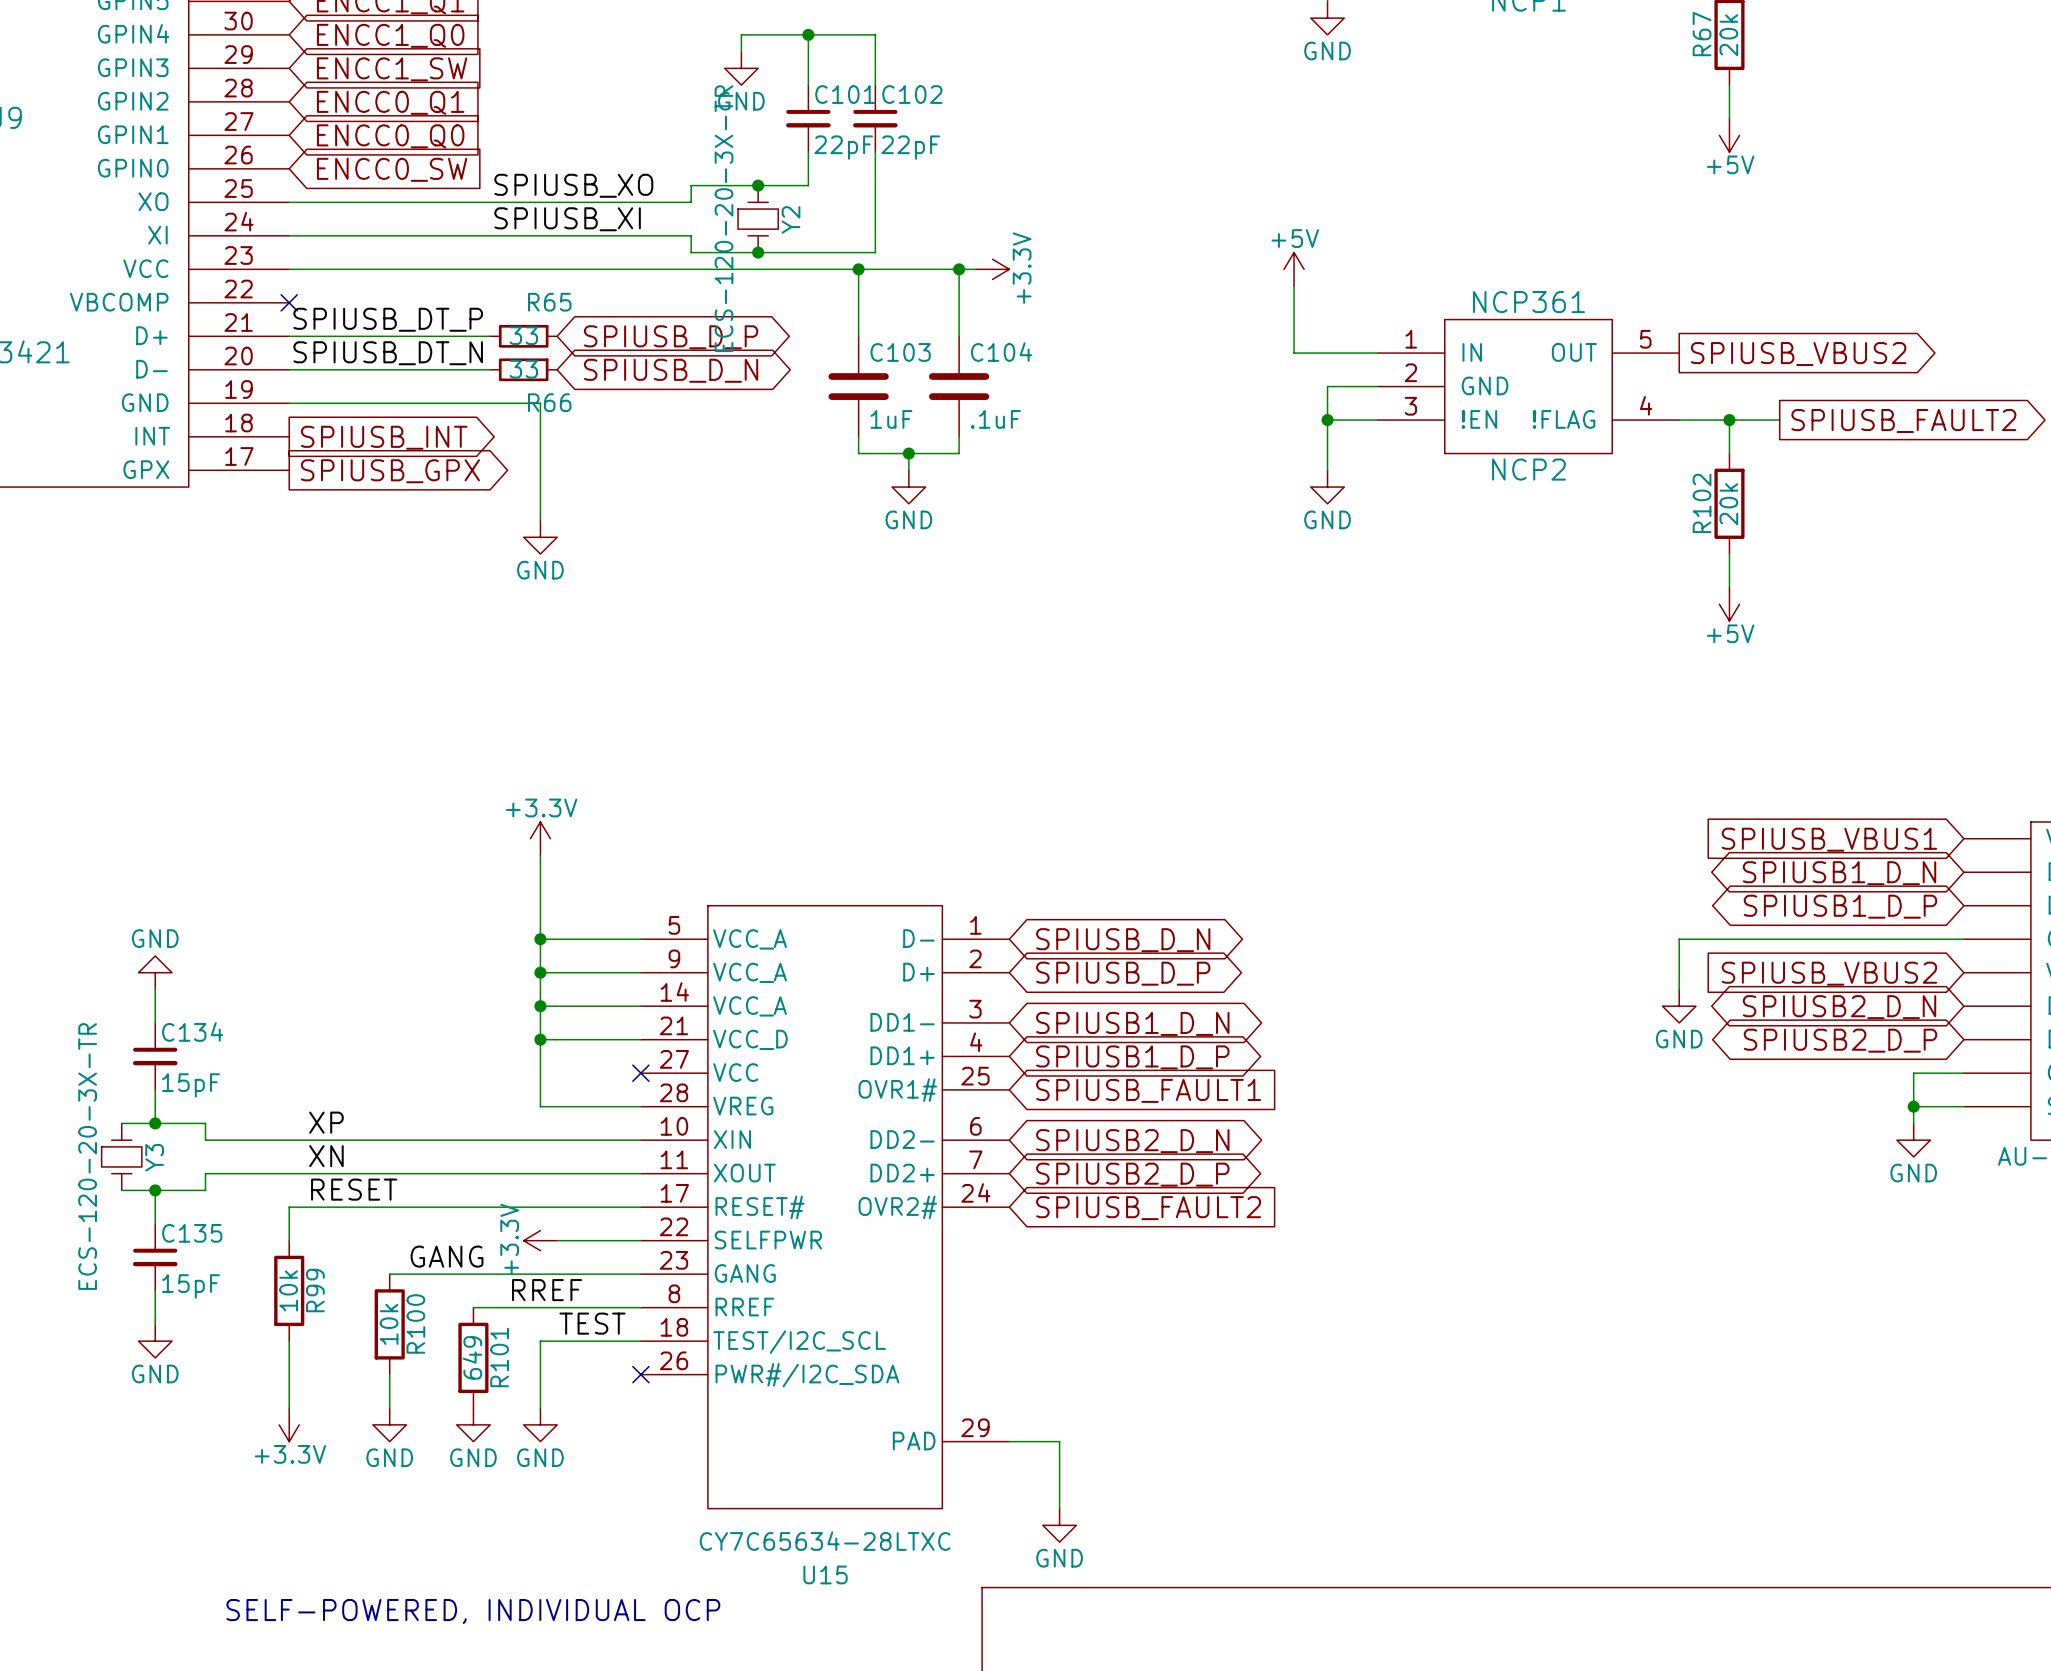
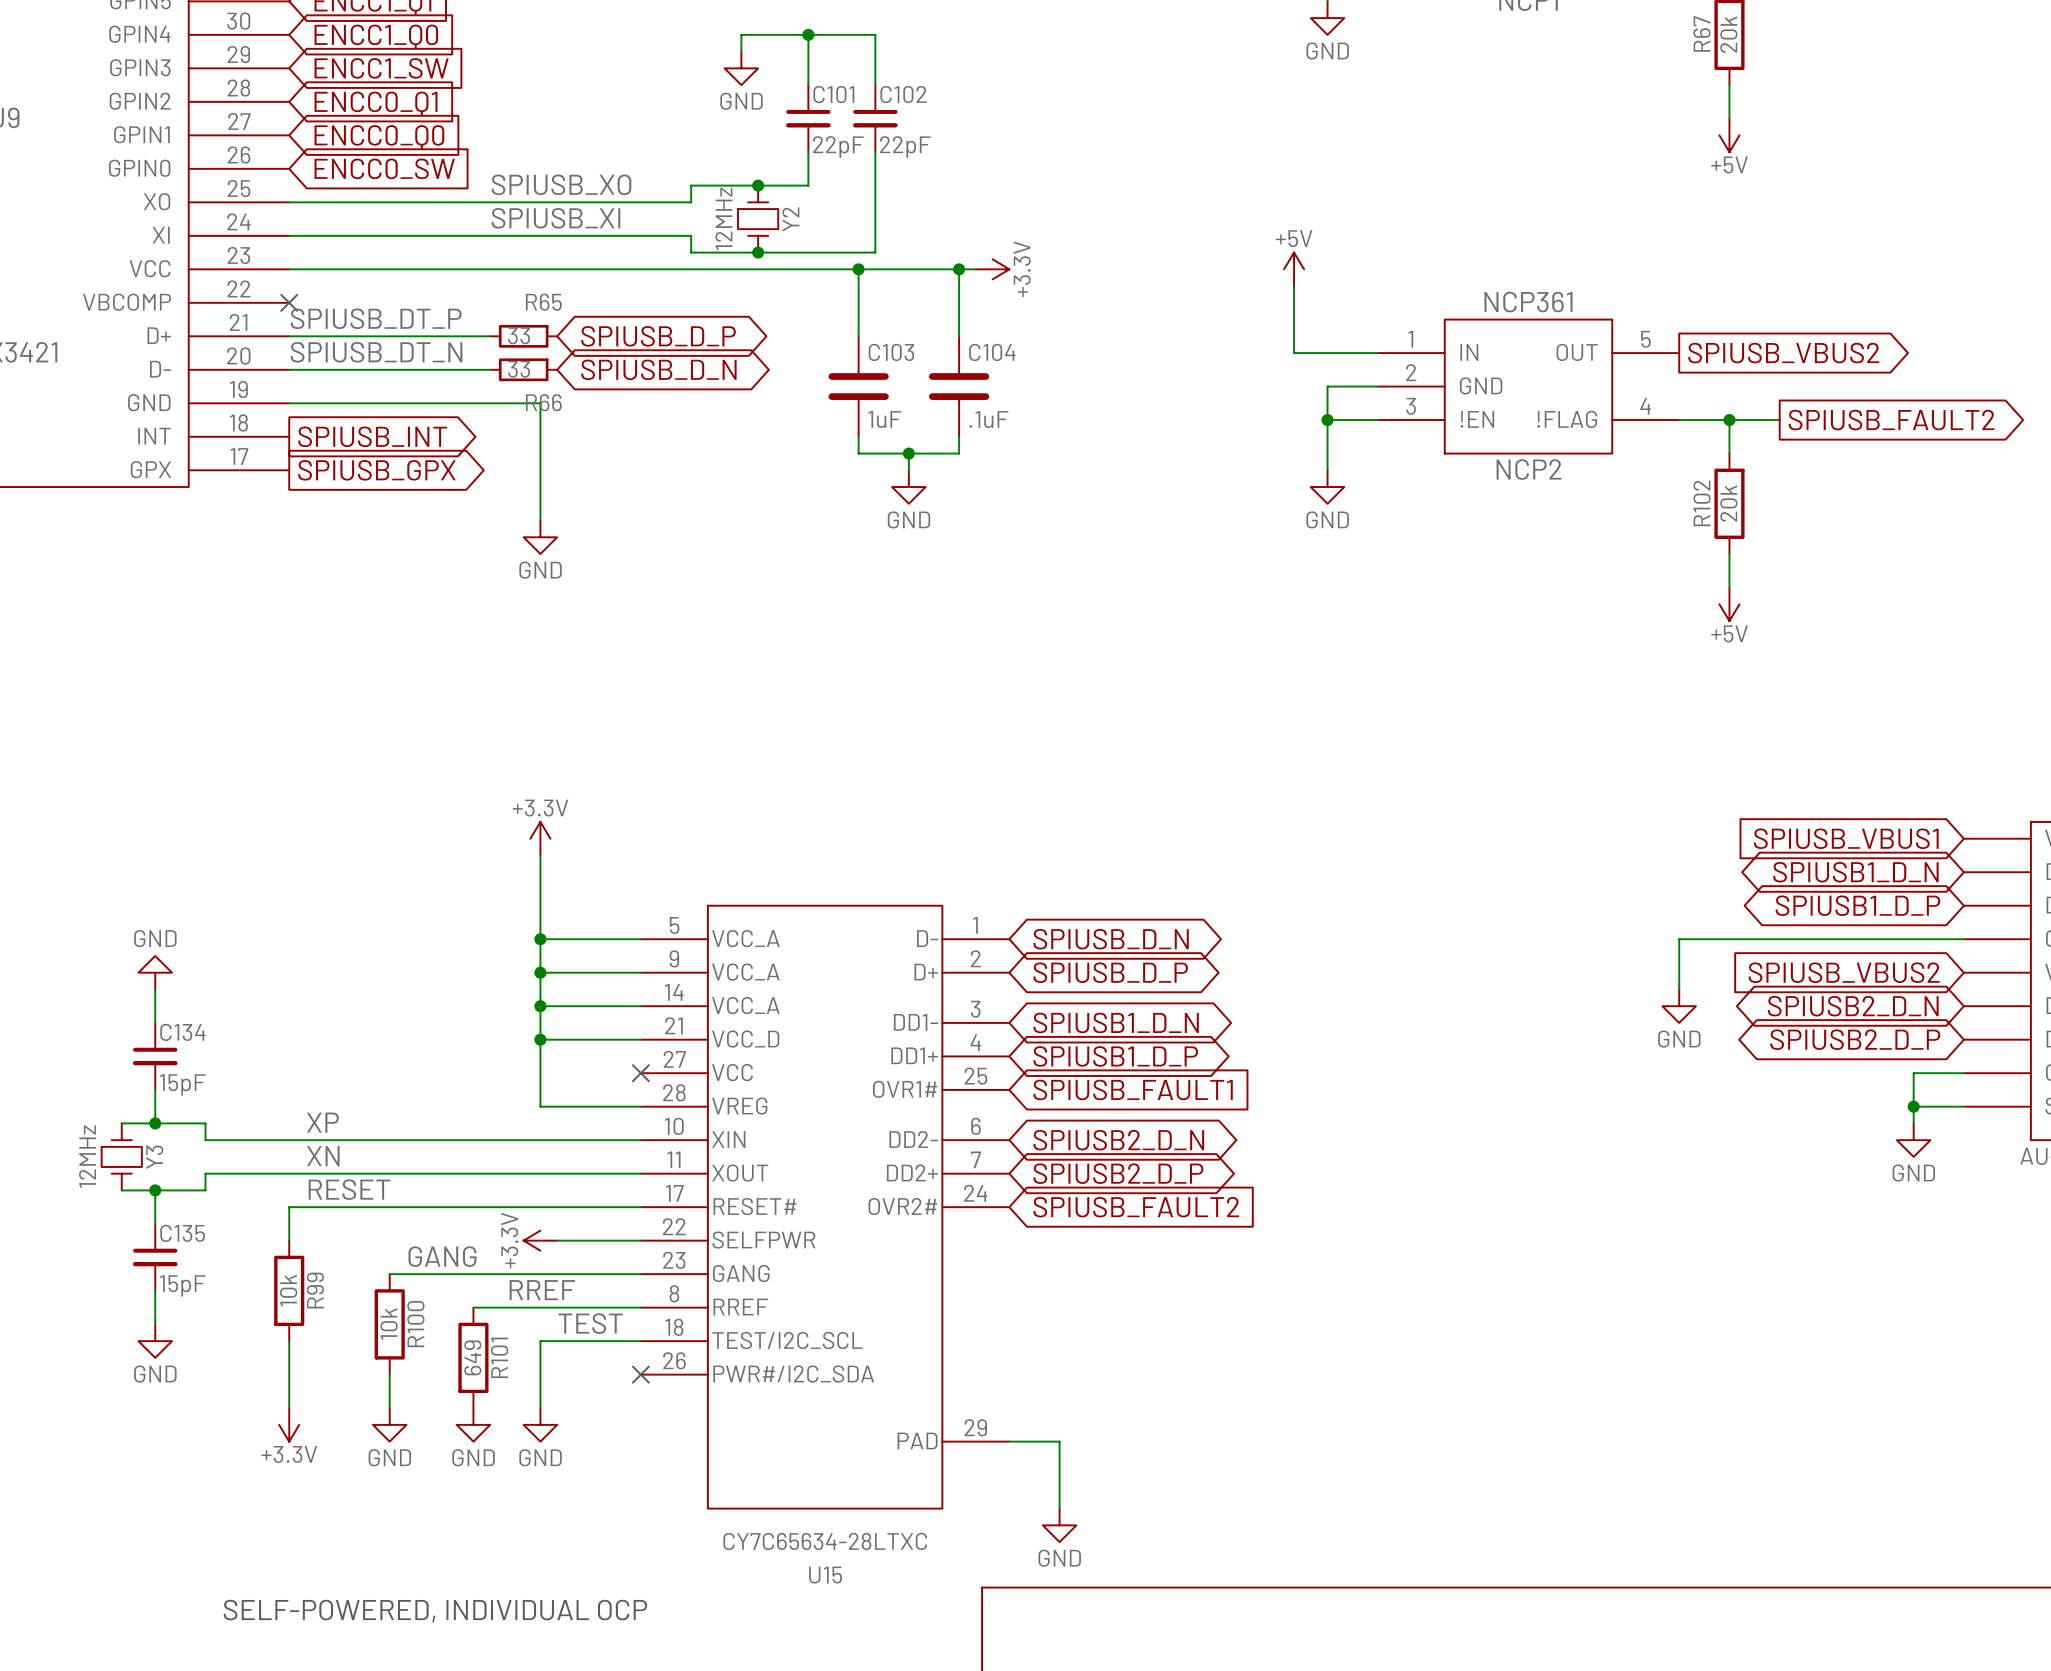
Y2 value: ECS-120-20-3X-TR (724, 218) -> 12MHz (723, 218)
Y3 value: ECS-120-20-3X-TR (87, 1156) -> 12MHz (87, 1156)

